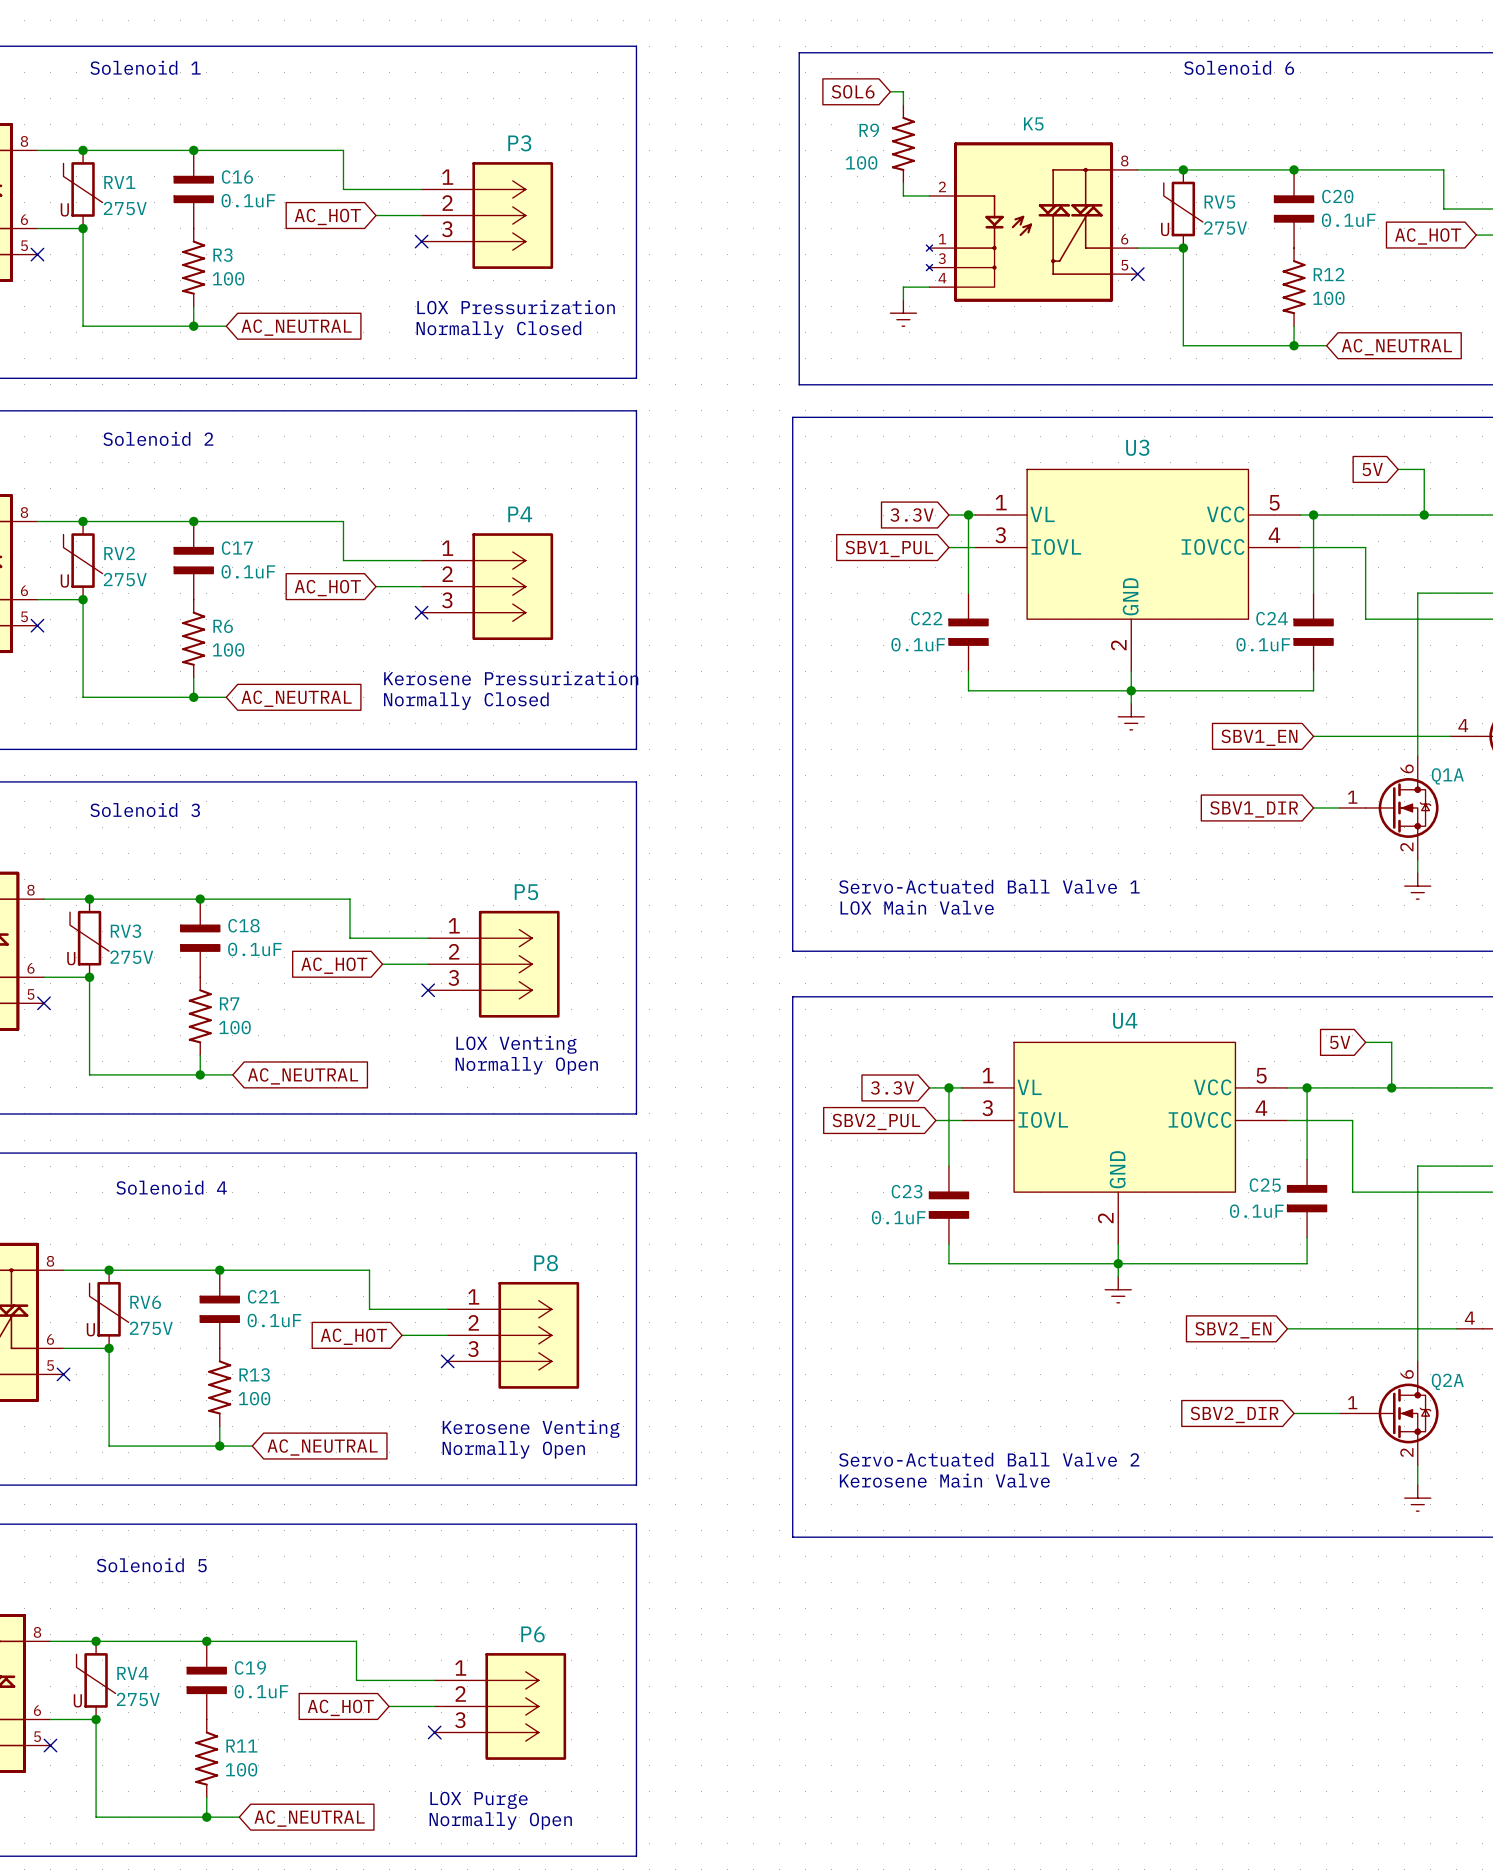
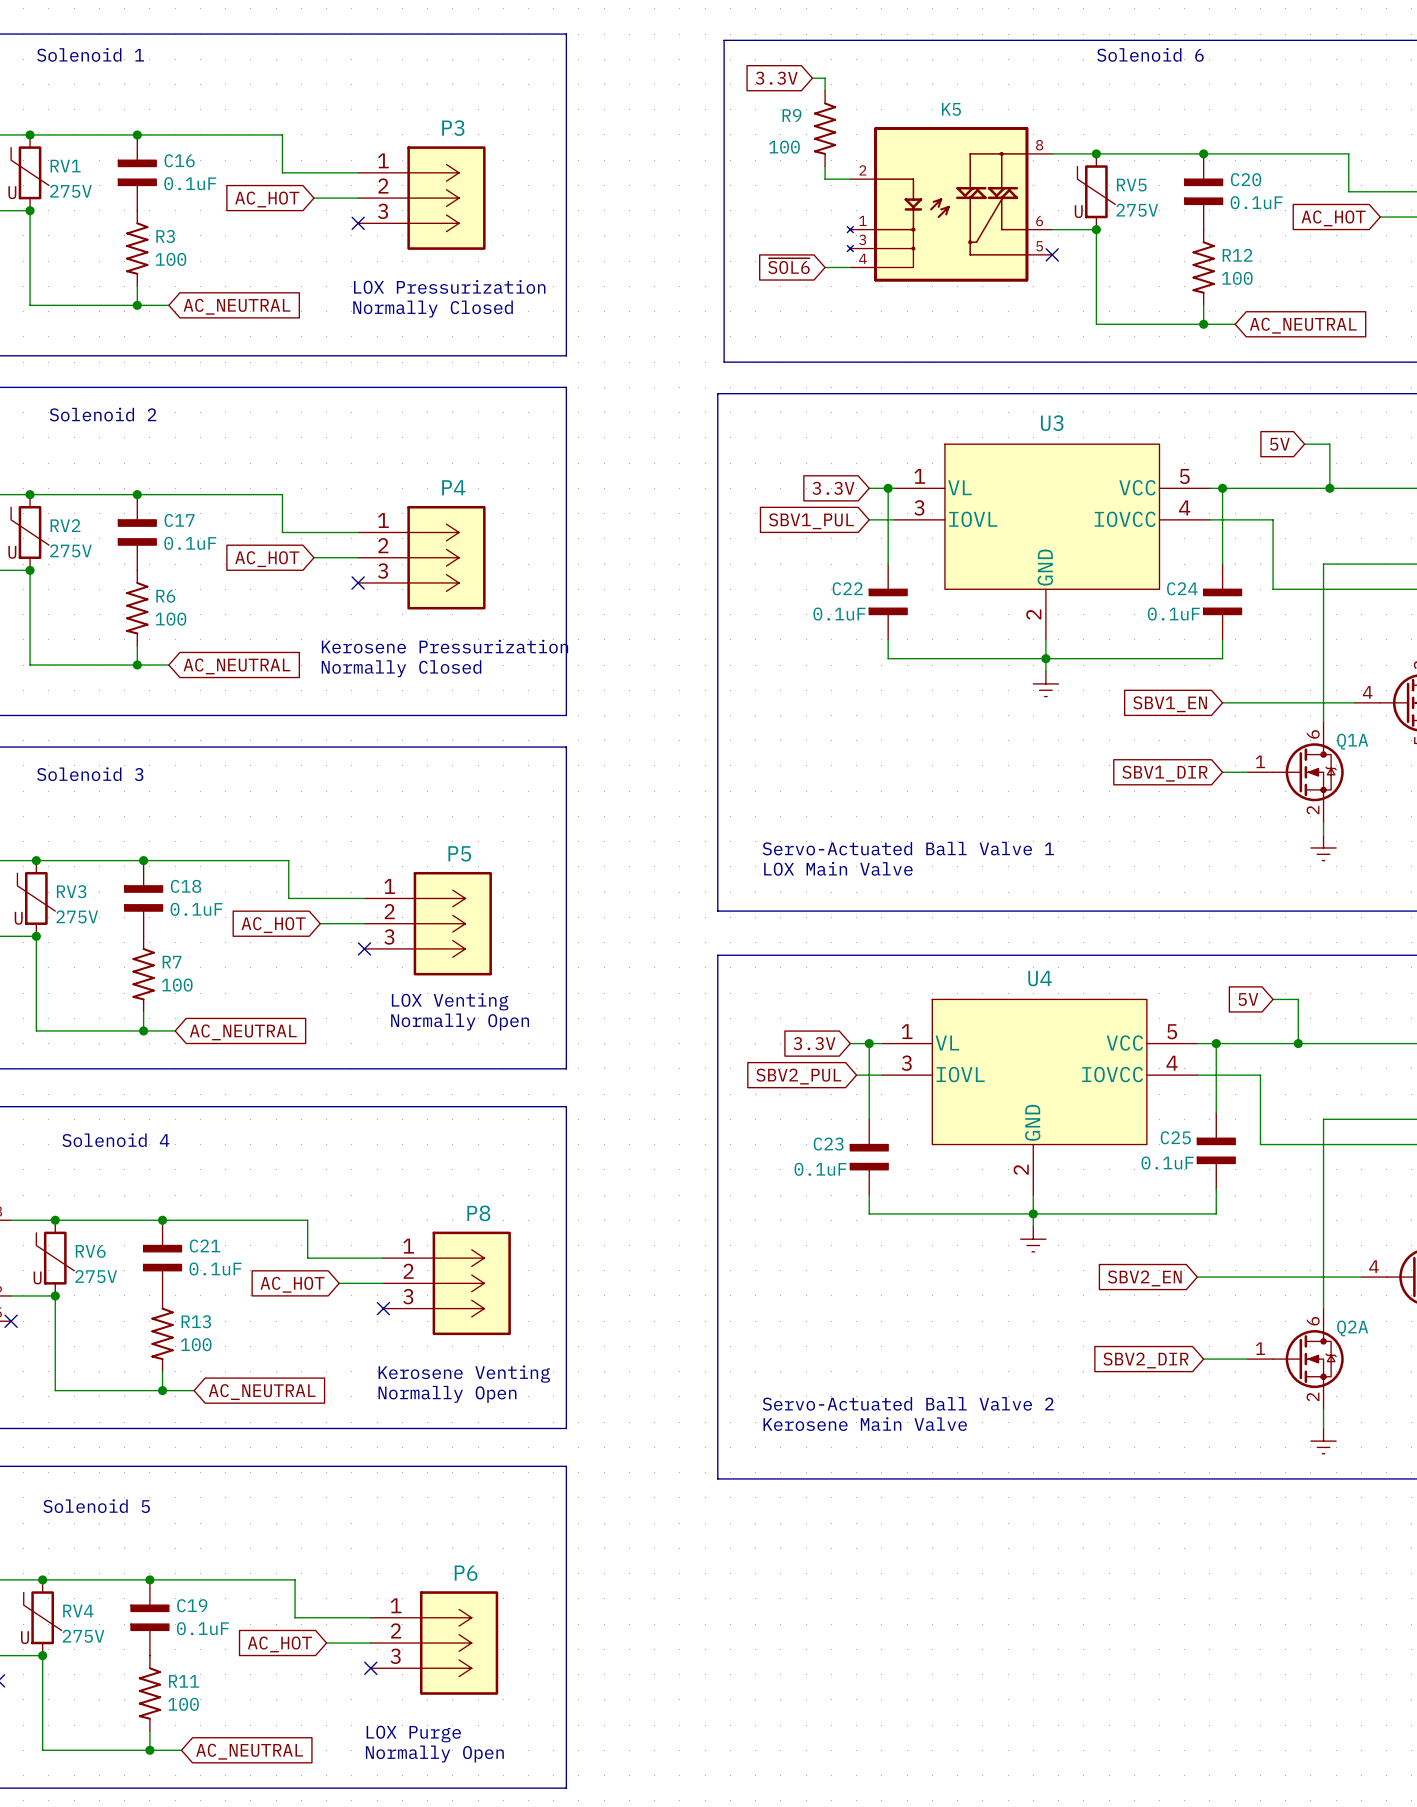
global label: SOL6 (853, 91) -> 3.3V (776, 78)
global label: none -> ~{SOL6} (789, 266)
wire: (903, 287) (903, 300) -> none
power symbol: (903, 313) -> none

